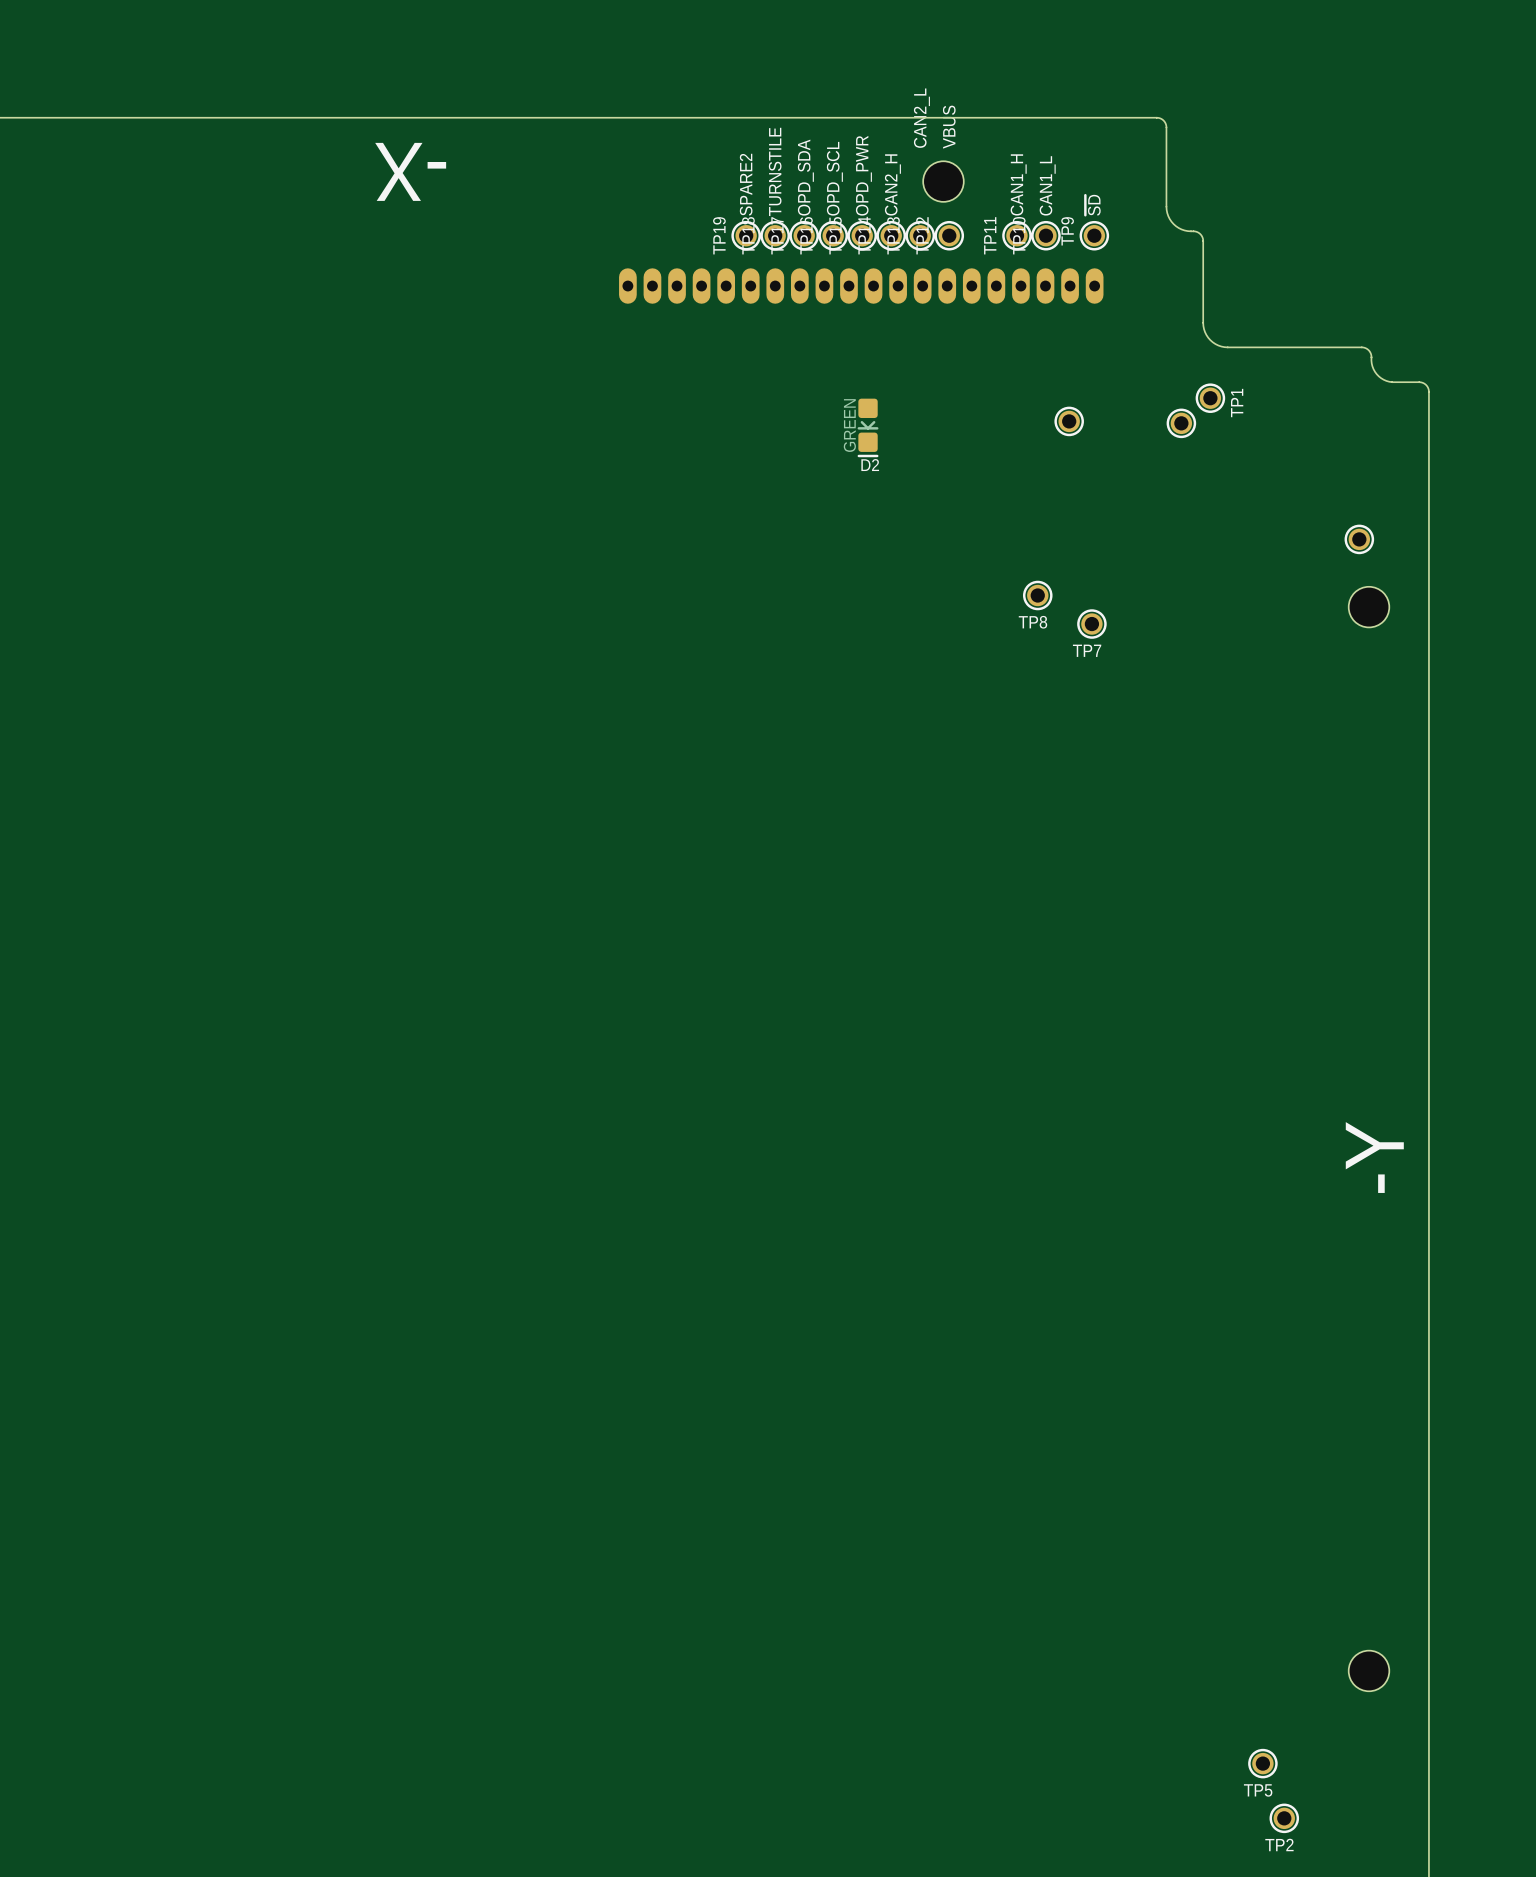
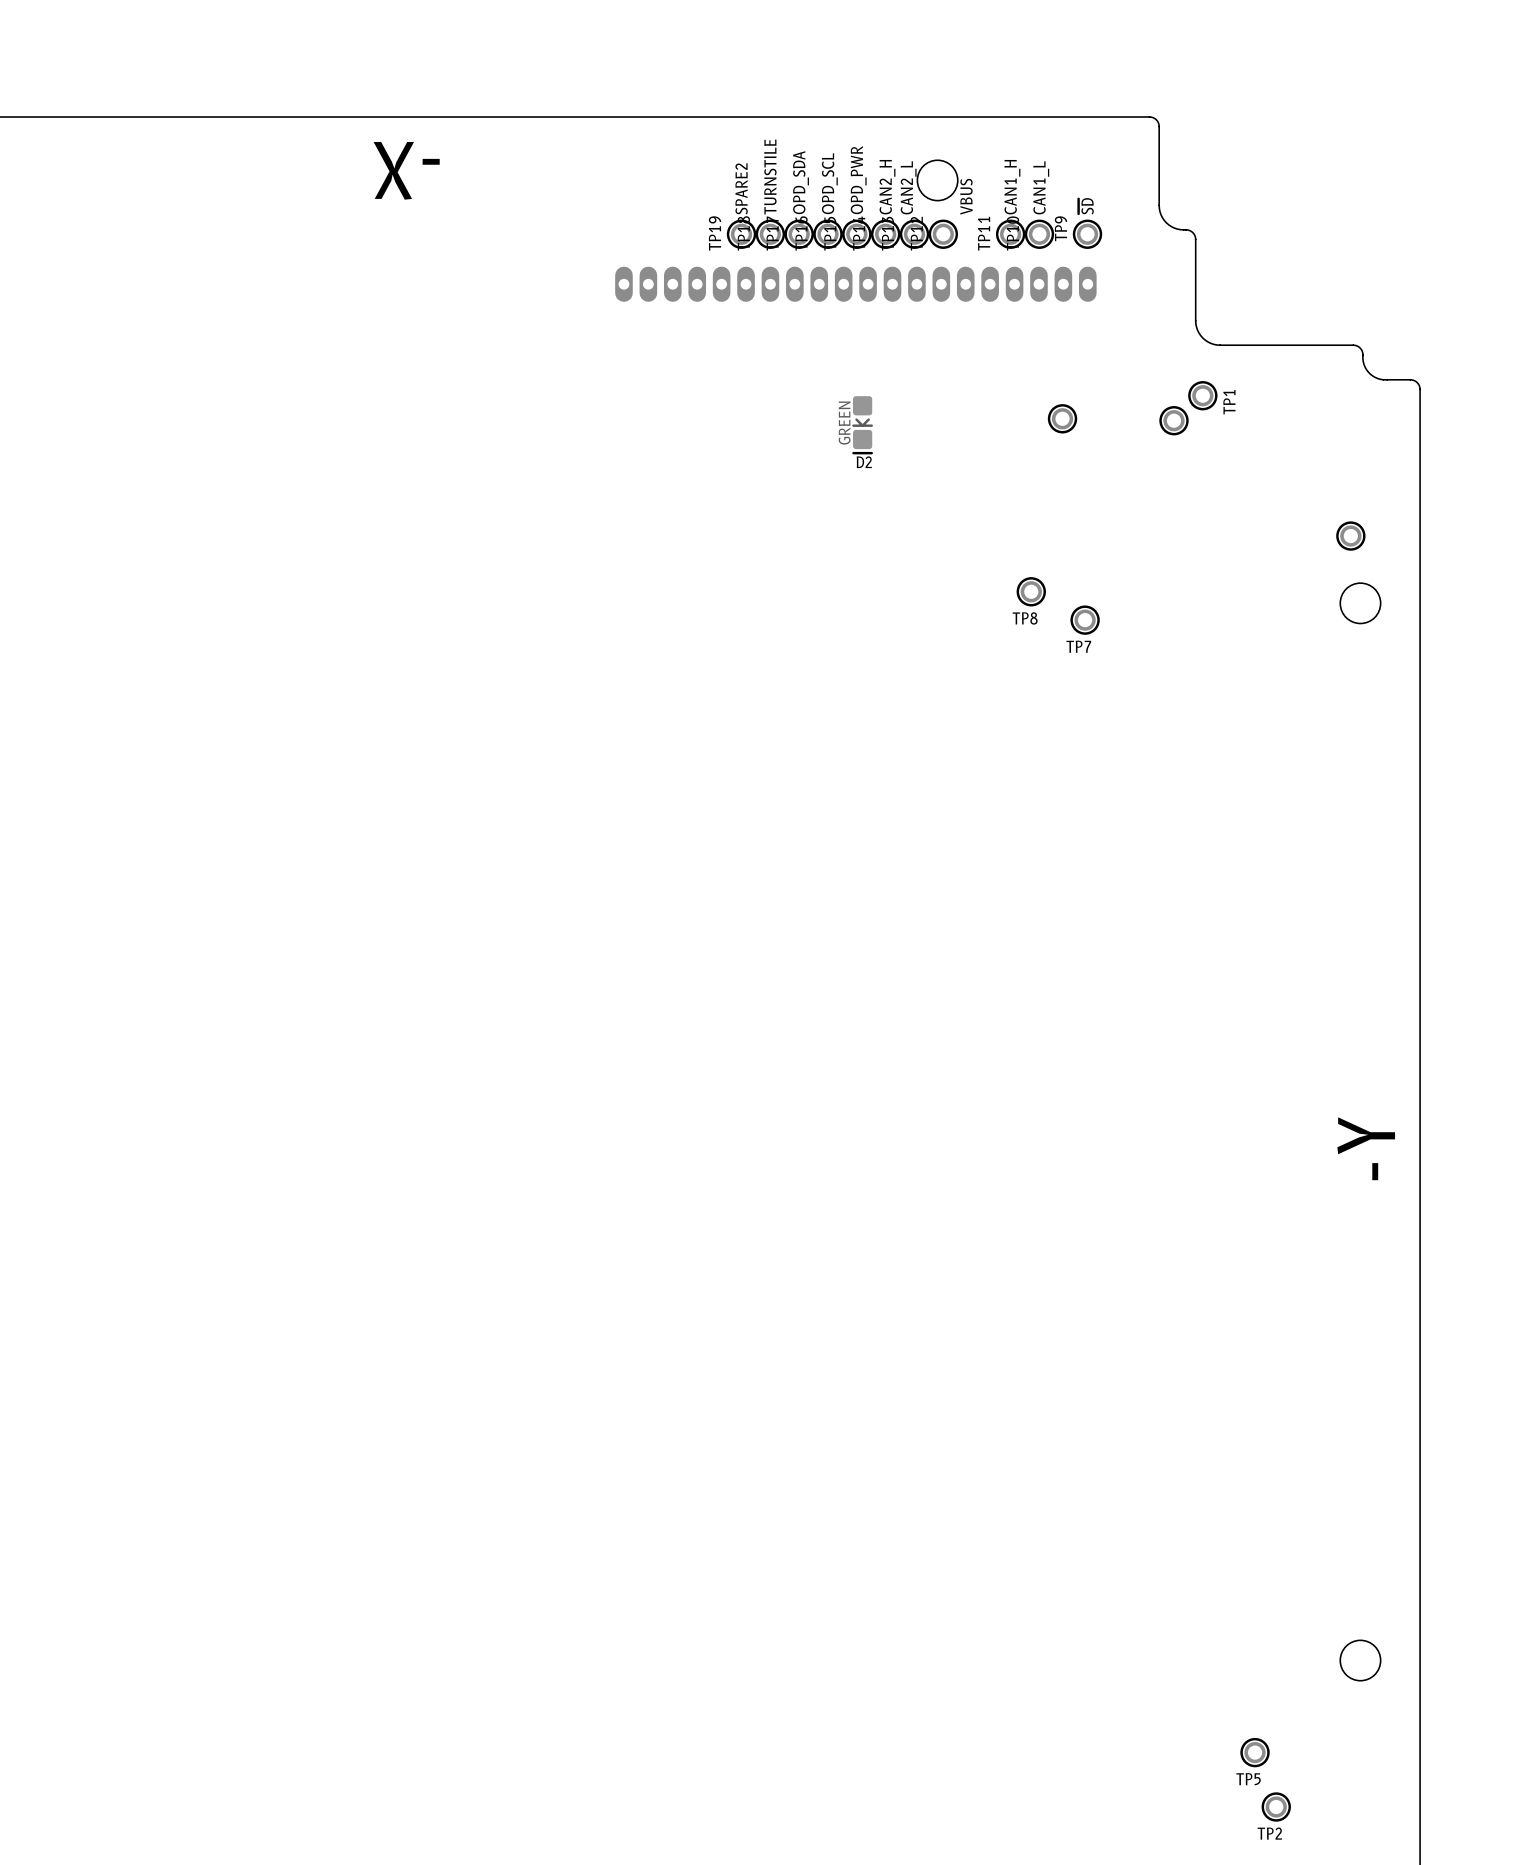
text position: CAN2_L (921, 118) -> CAN2_L (908, 187)
text position: VBUS (949, 127) -> VBUS (966, 196)

